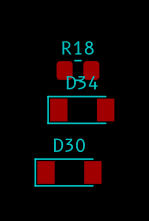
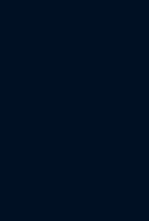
R18: (77, 70) -> none
D34: (80, 109) -> none
D30: (68, 172) -> none

